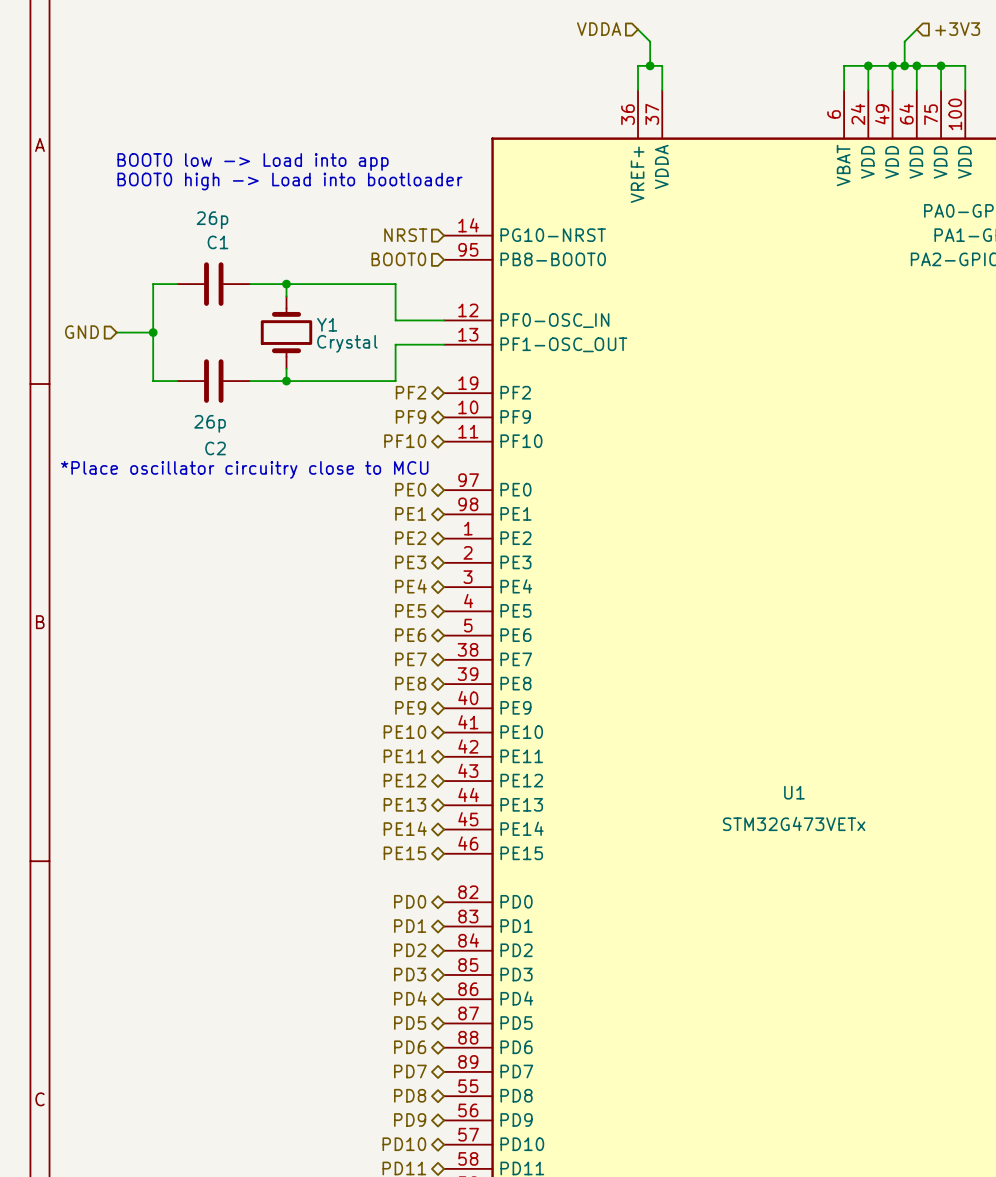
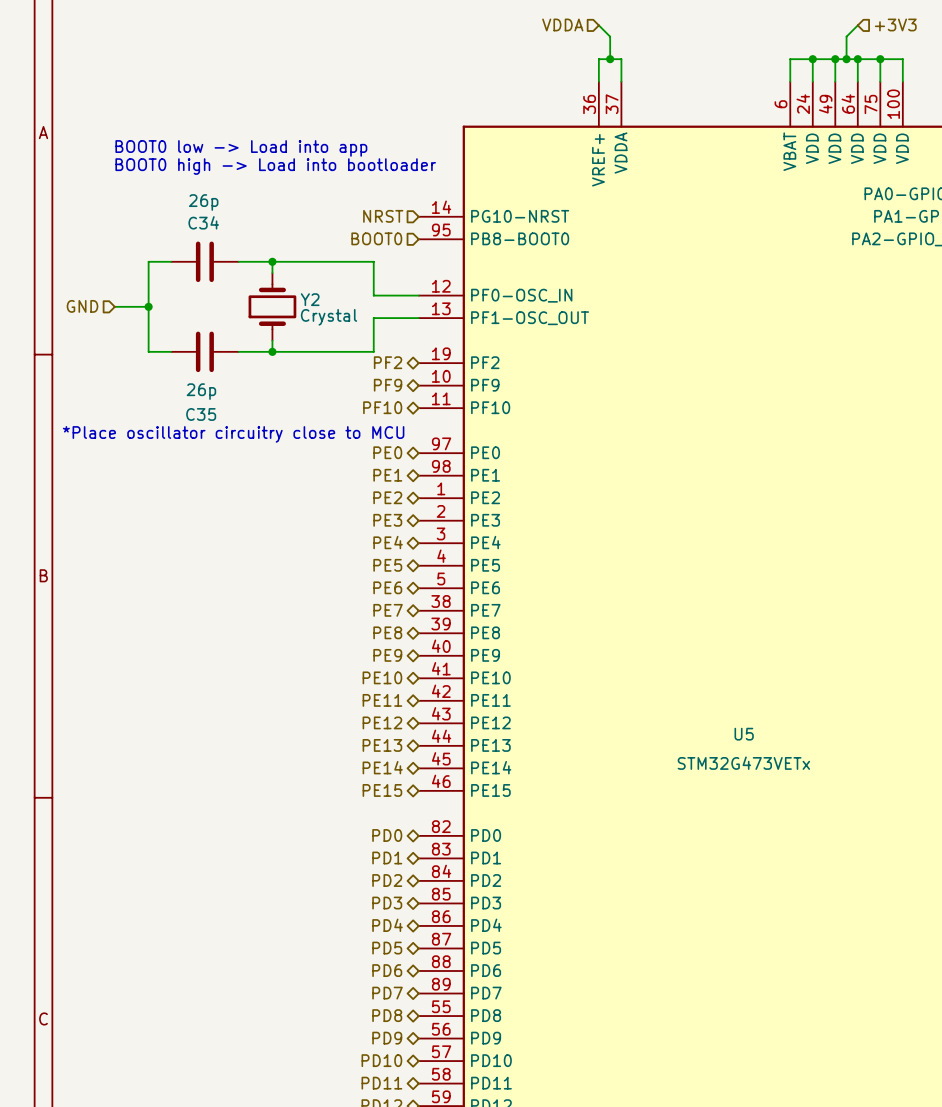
C1 name: C1 (217, 242) -> C34 (203, 222)
Y1 name: Y1 (327, 324) -> Y2 (310, 299)
C2 name: C2 (215, 448) -> C35 (201, 414)
U1 name: U1 (794, 792) -> U5 (744, 734)

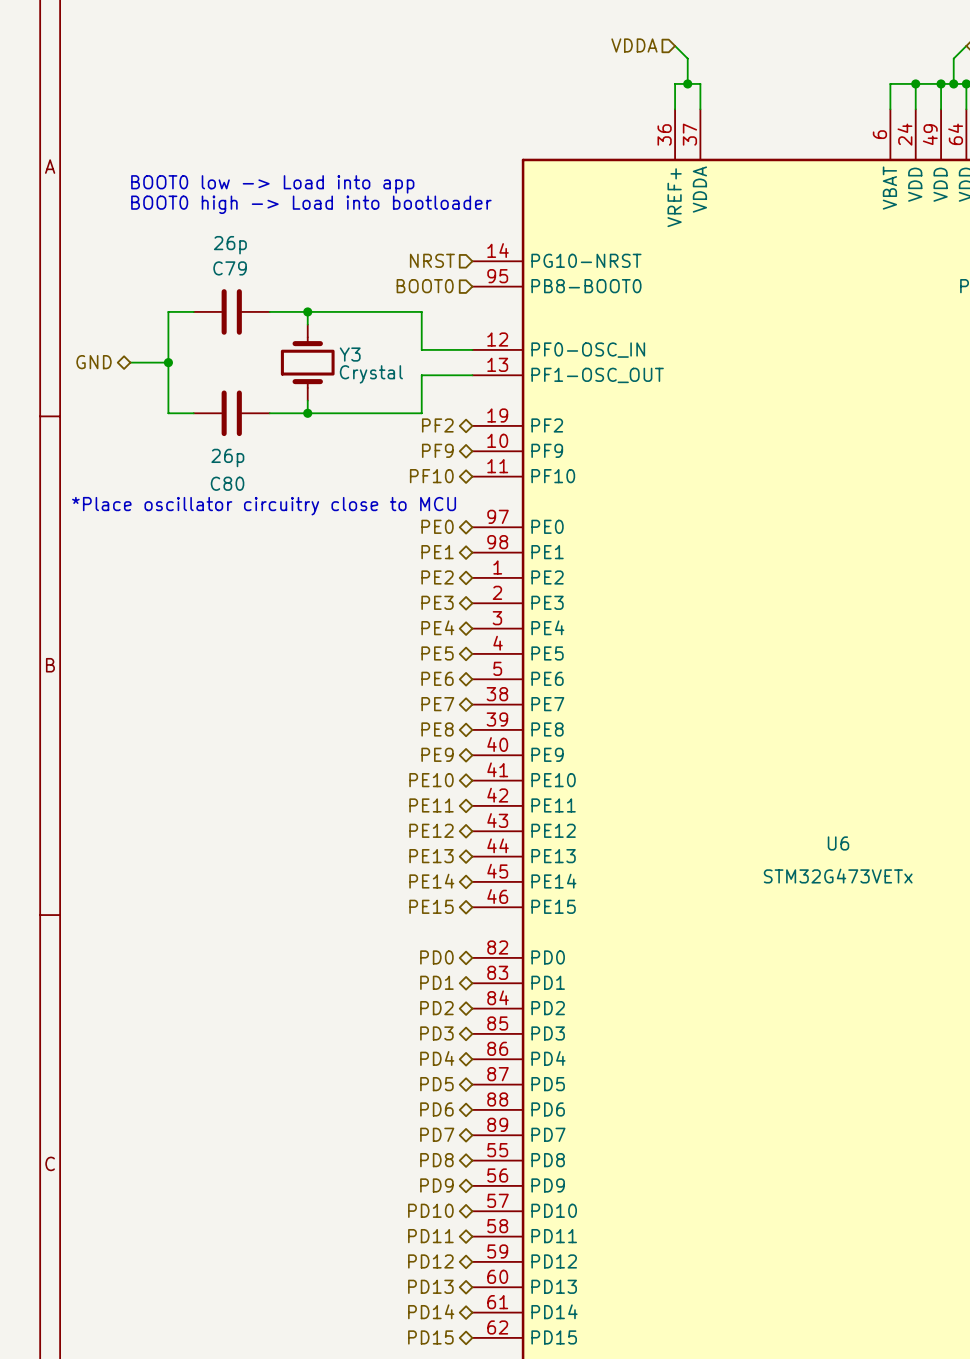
C34 name: C34 (203, 222) -> C79 (230, 268)
Y2 name: Y2 (310, 299) -> Y3 (350, 354)
hierarchical label shape: input (82, 306) -> bidirectional (94, 362)
C35 name: C35 (201, 414) -> C80 (227, 483)
U5 name: U5 (744, 734) -> U6 (838, 843)

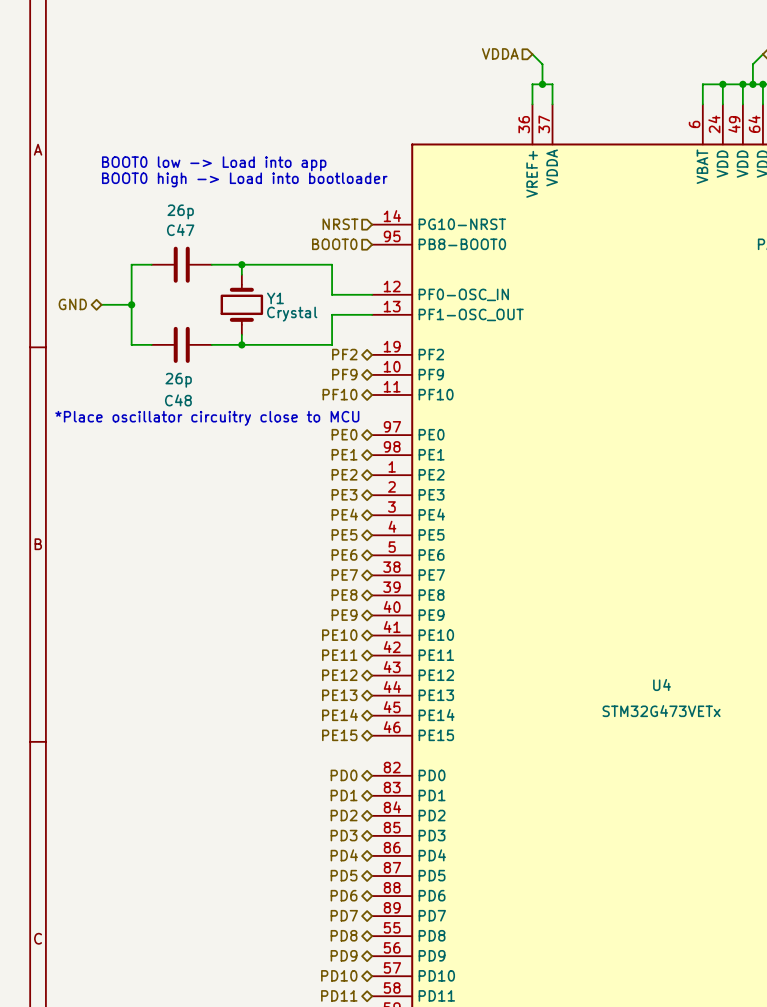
C79 name: C79 (230, 268) -> C47 (180, 230)
Y3 name: Y3 (350, 354) -> Y1 (275, 298)
C80 name: C80 (227, 483) -> C48 (178, 400)
U6 name: U6 (838, 843) -> U4 (662, 685)

